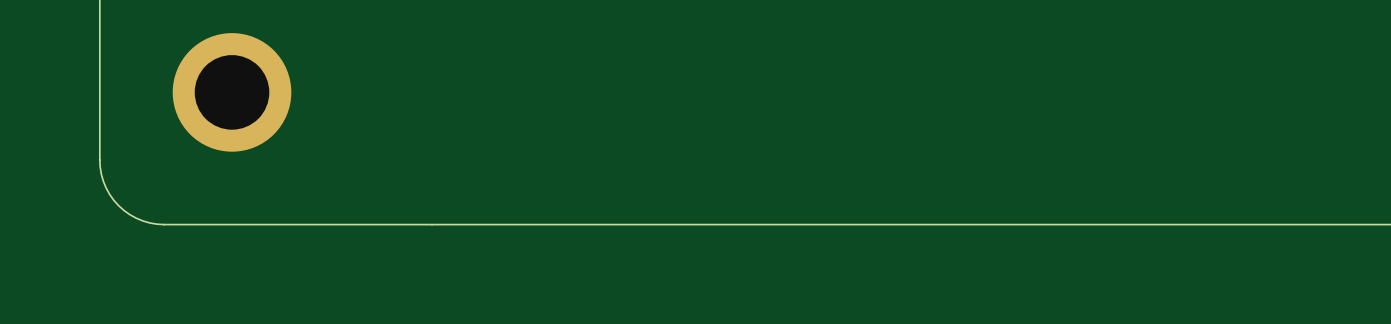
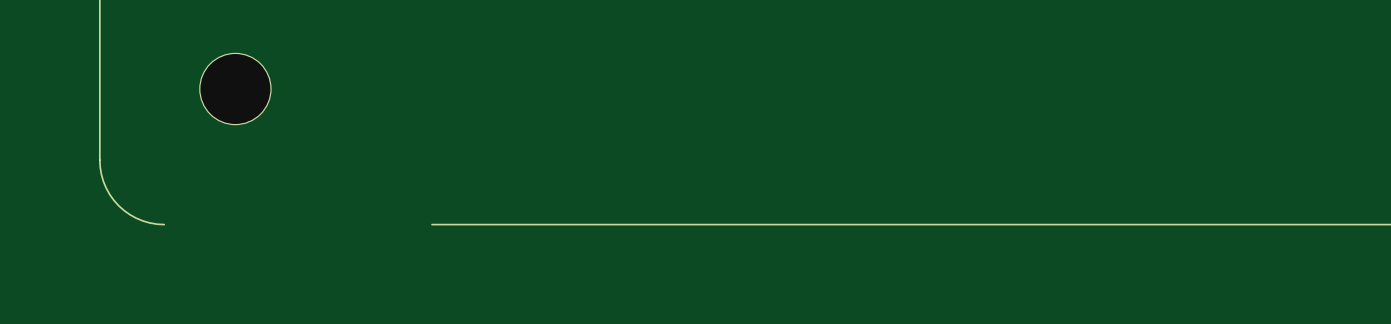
part footprint: [172, 33, 292, 152] -> [199, 53, 271, 125]
board edge: (432, 224) (164, 224) -> none

